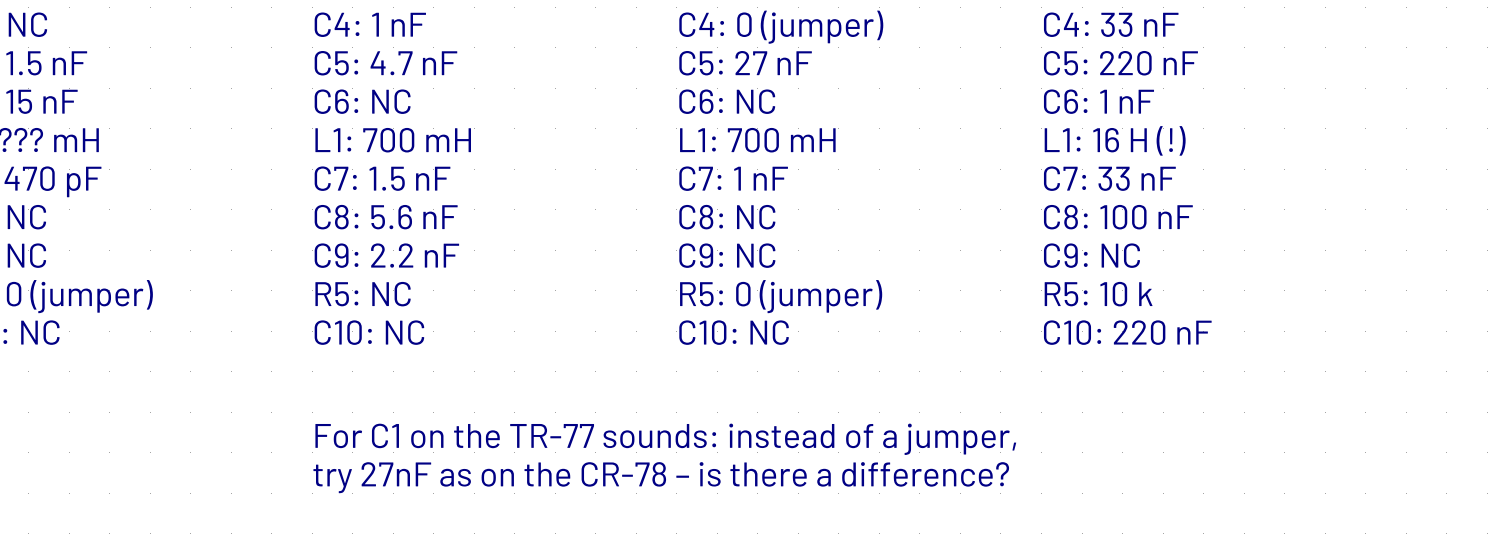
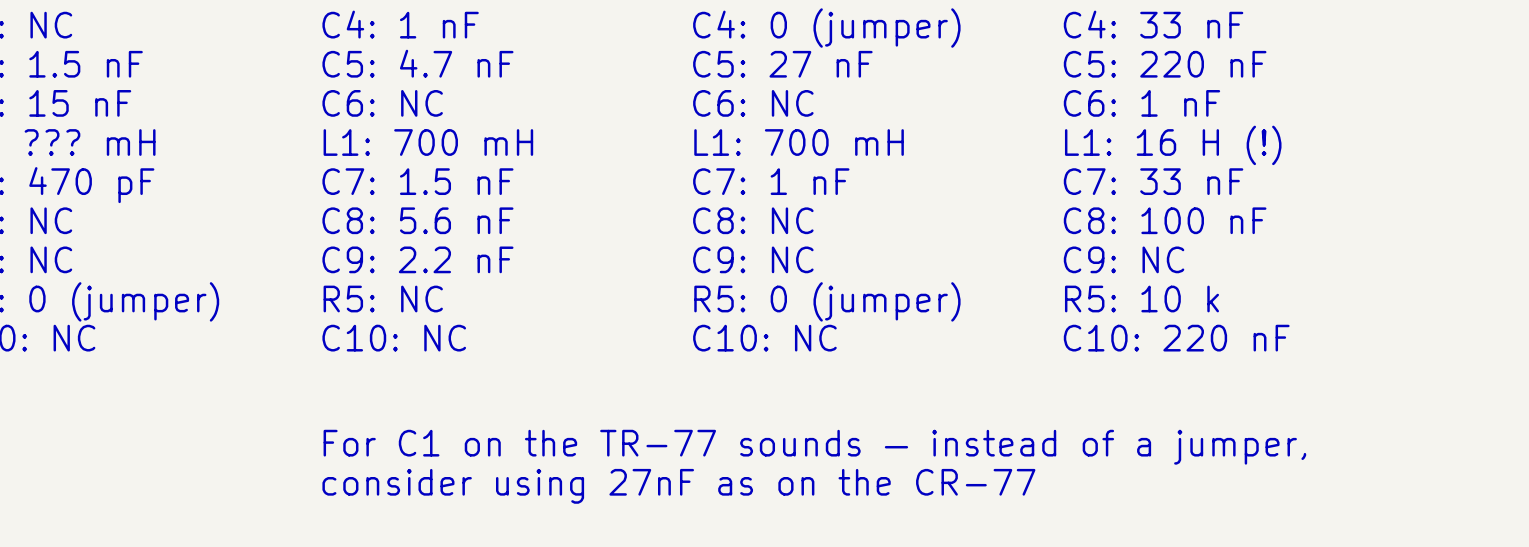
text: For C1 on the TR-77 sounds: instead of a jumper, (665, 439) -> For C1 on the TR-77 sounds — instead of a jumper, (814, 447)
text: try 27nF as on the CR-78 – is there a difference? (661, 477) -> consider using 27nF as on the CR-77 (678, 486)

